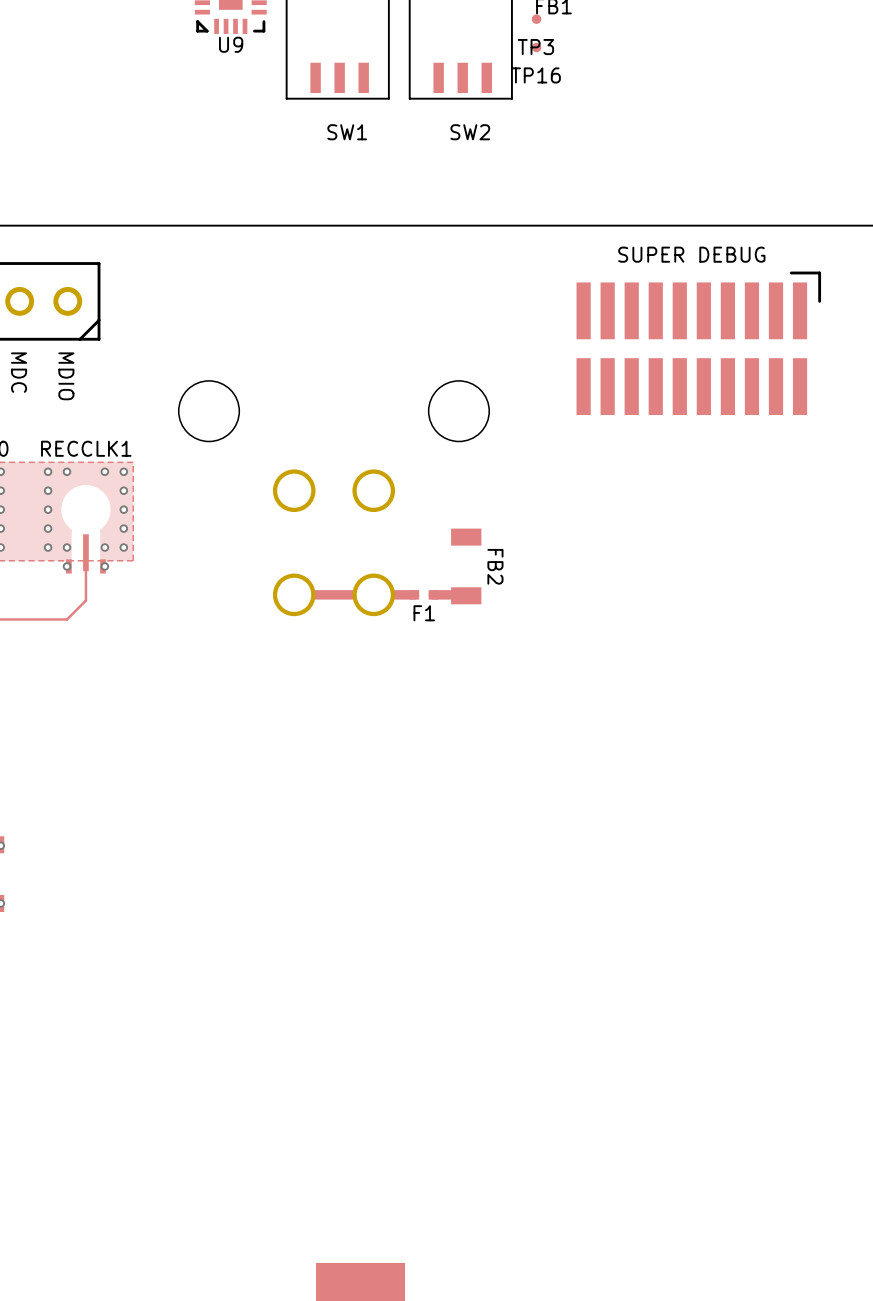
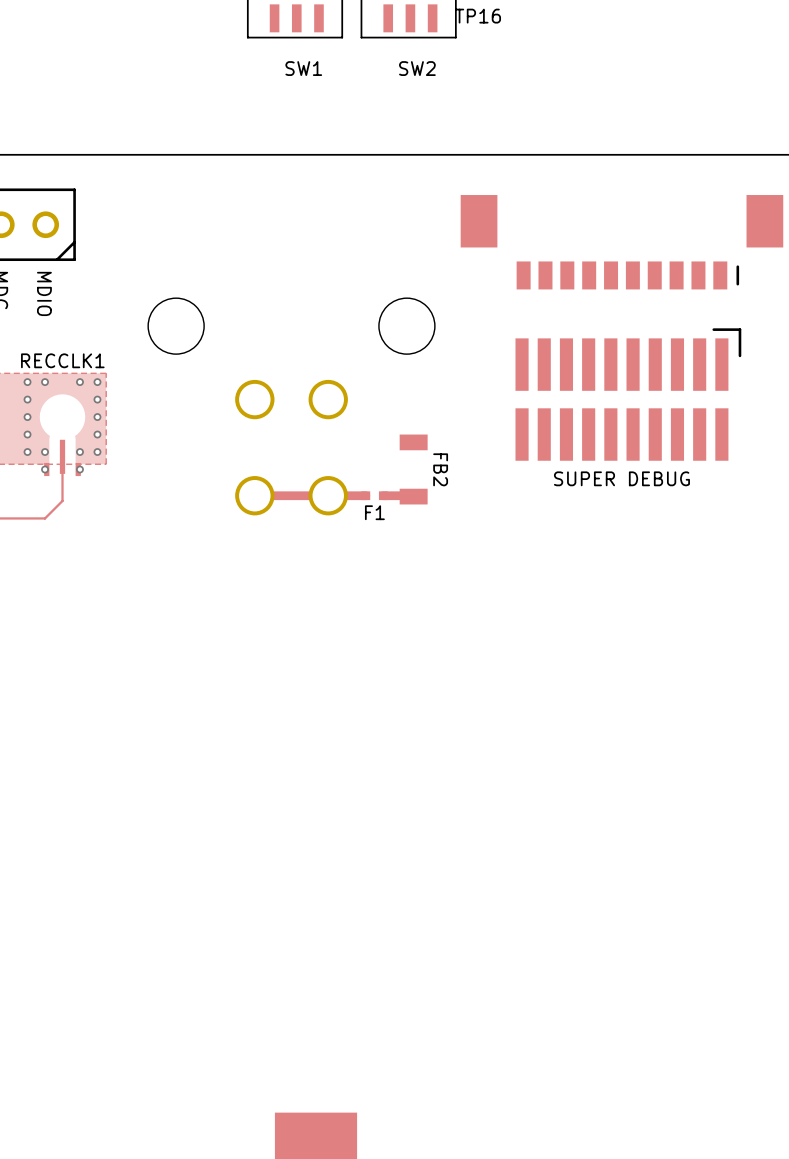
text position: SUPER DEBUG (691, 254) -> SUPER DEBUG (621, 478)
part: none -> (621, 242)
part position: (698, 343) -> (628, 394)

